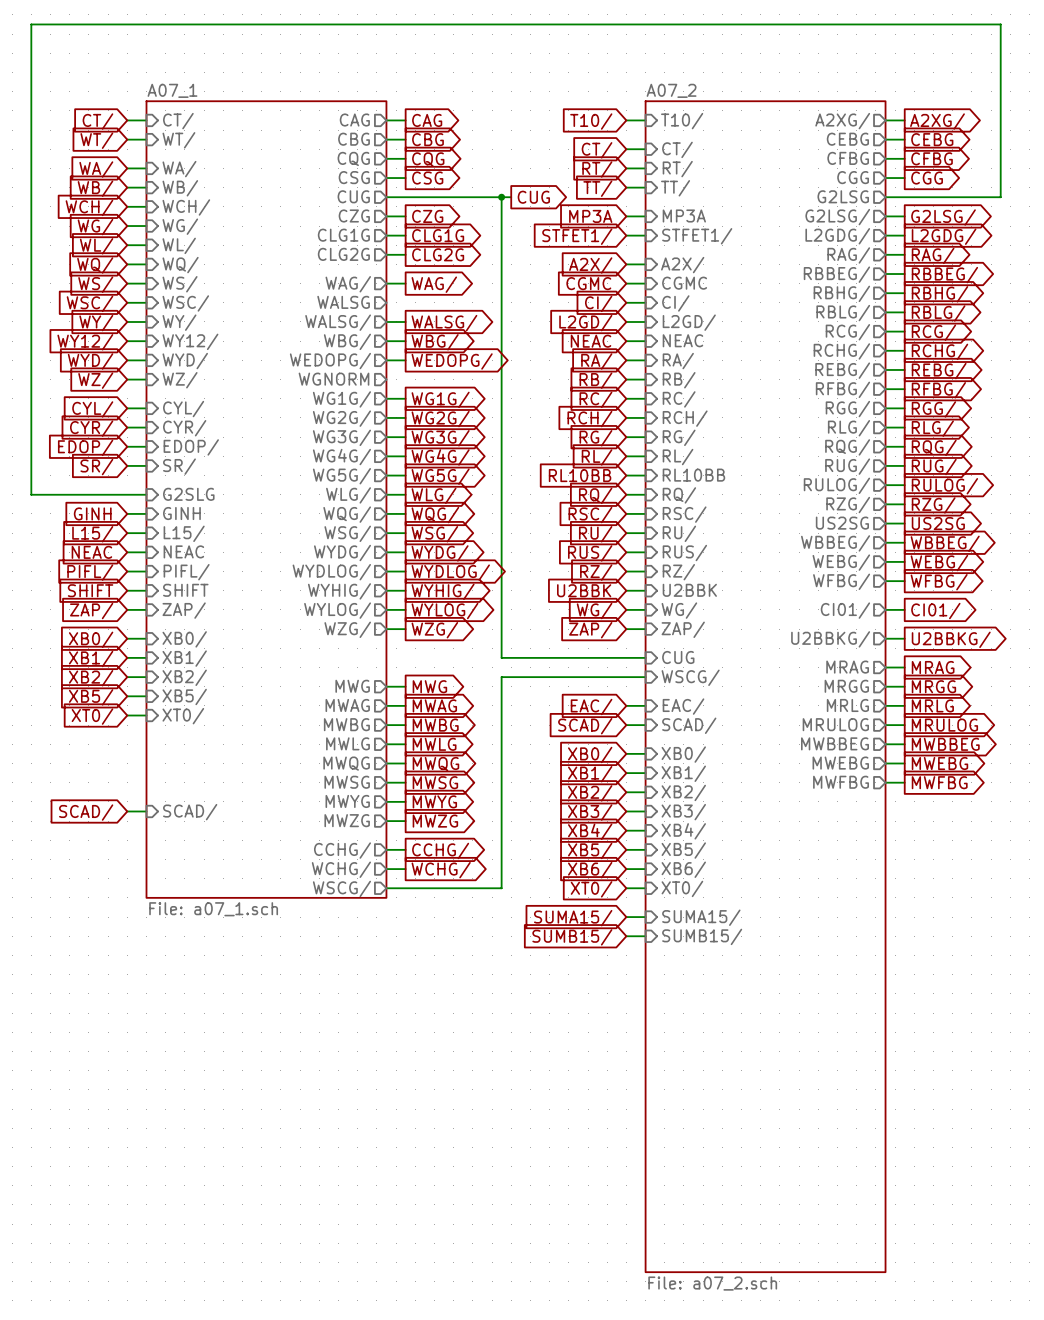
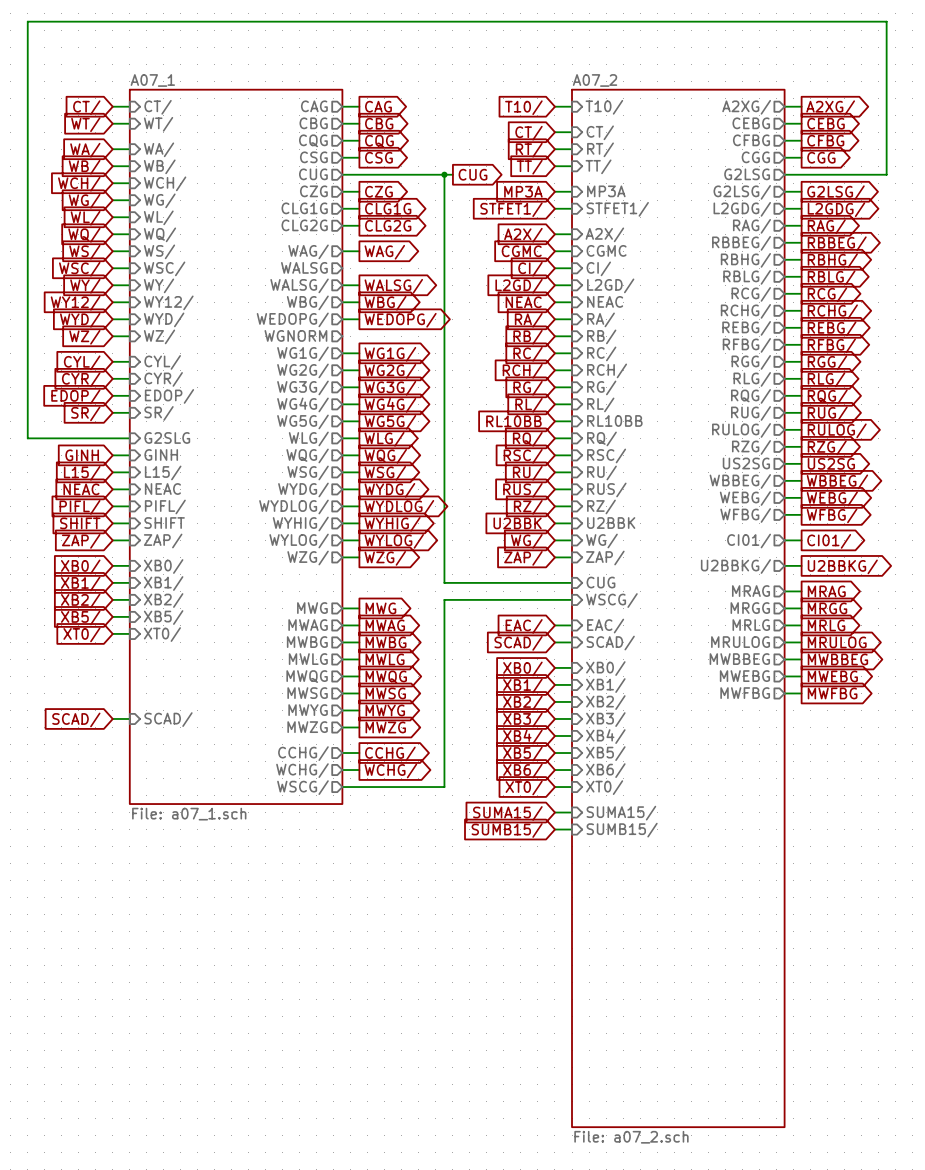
sheet A07_1 shape: [146, 101, 387, 898] -> [129, 89, 343, 805]

